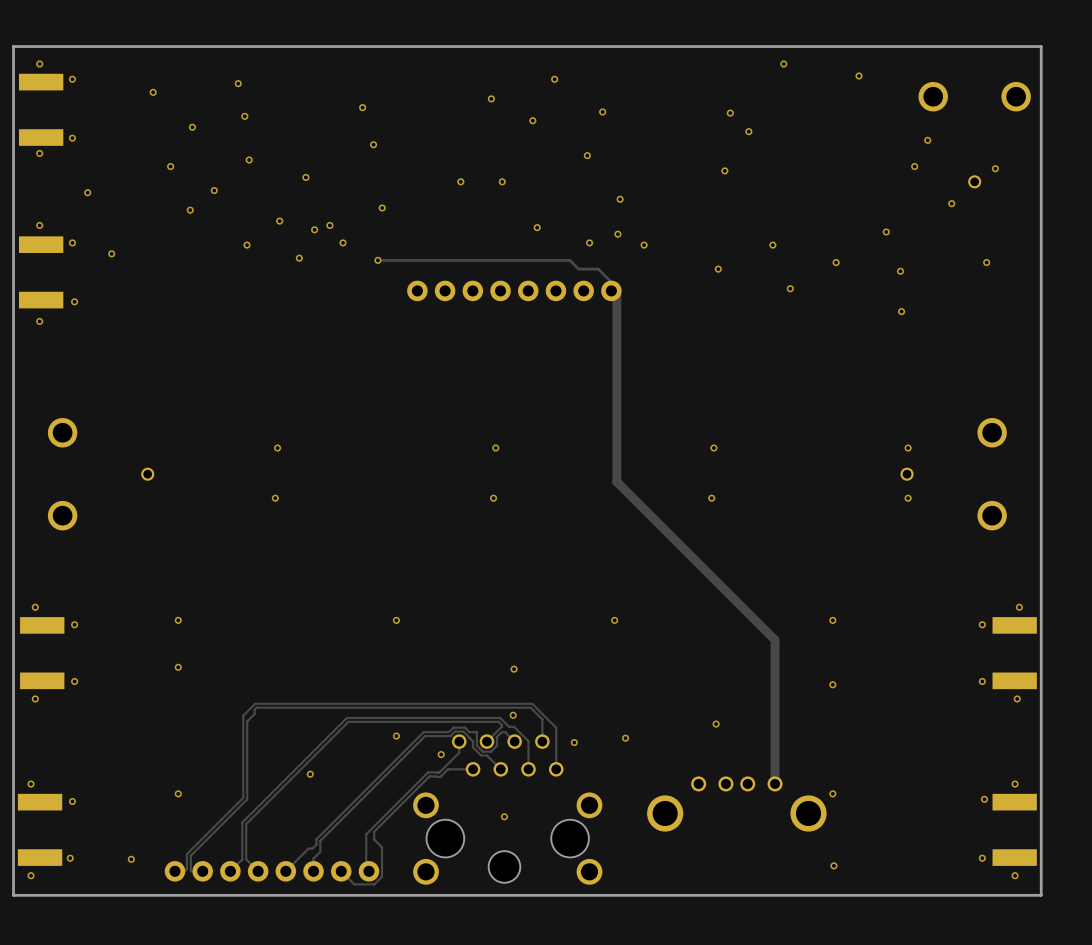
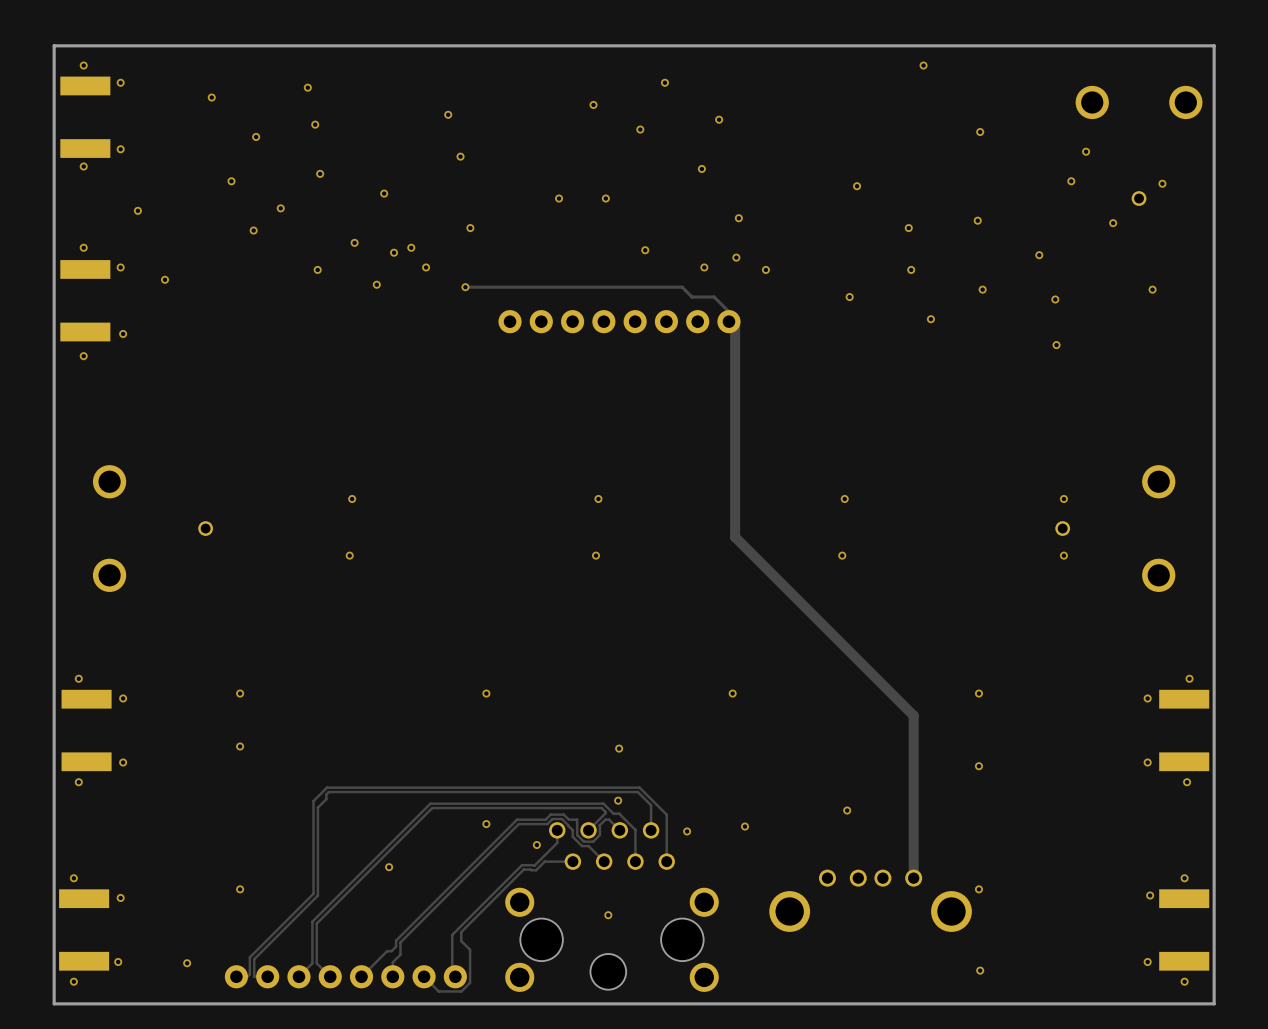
via: (859, 75) -> none
via: (730, 113) -> none
via: none -> (980, 132)
via: (748, 131) -> none
via: none -> (977, 220)
via: none -> (908, 228)

